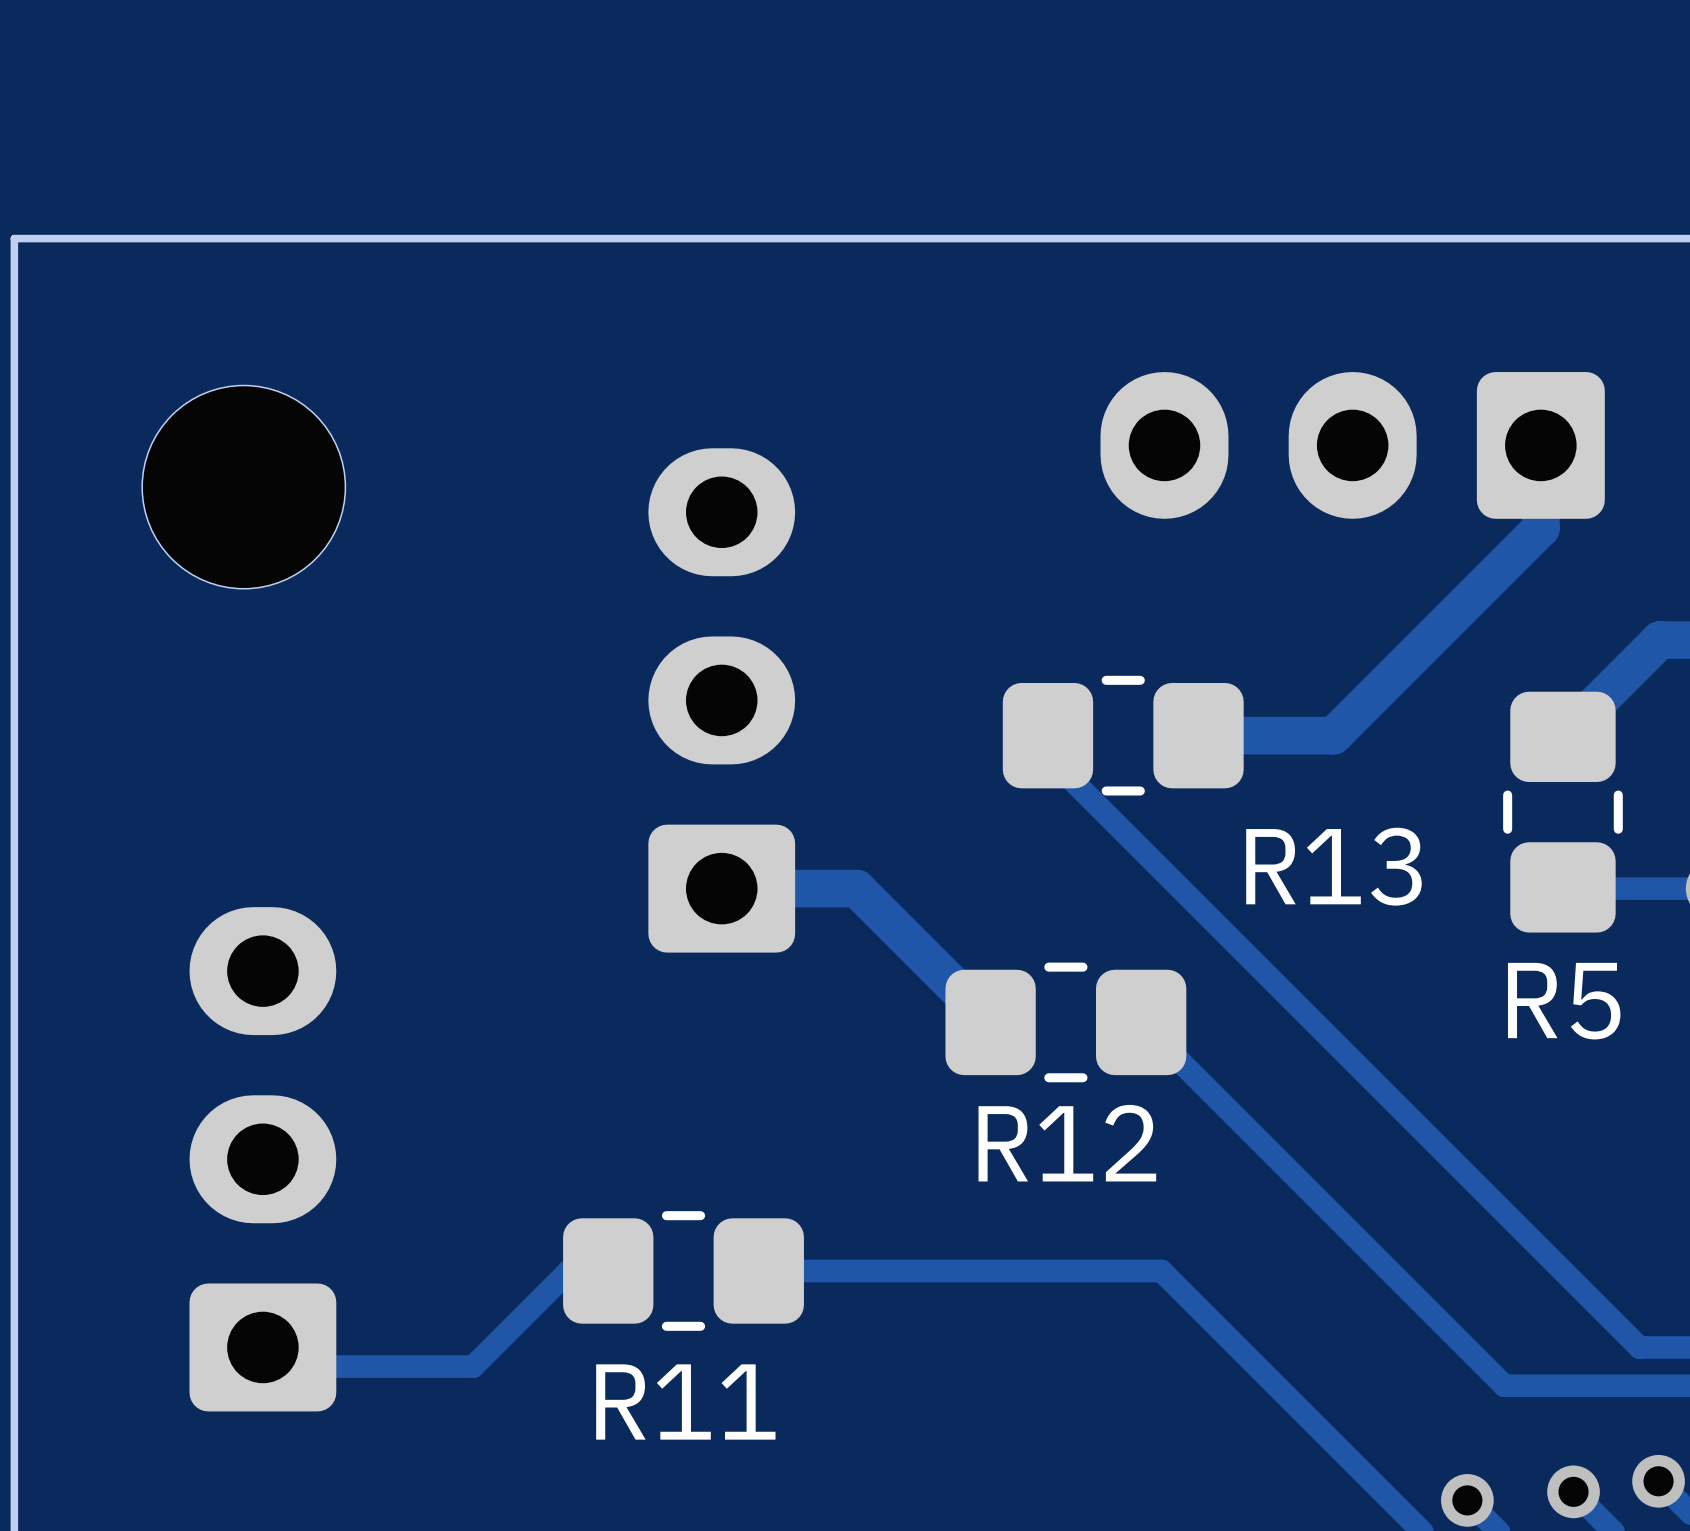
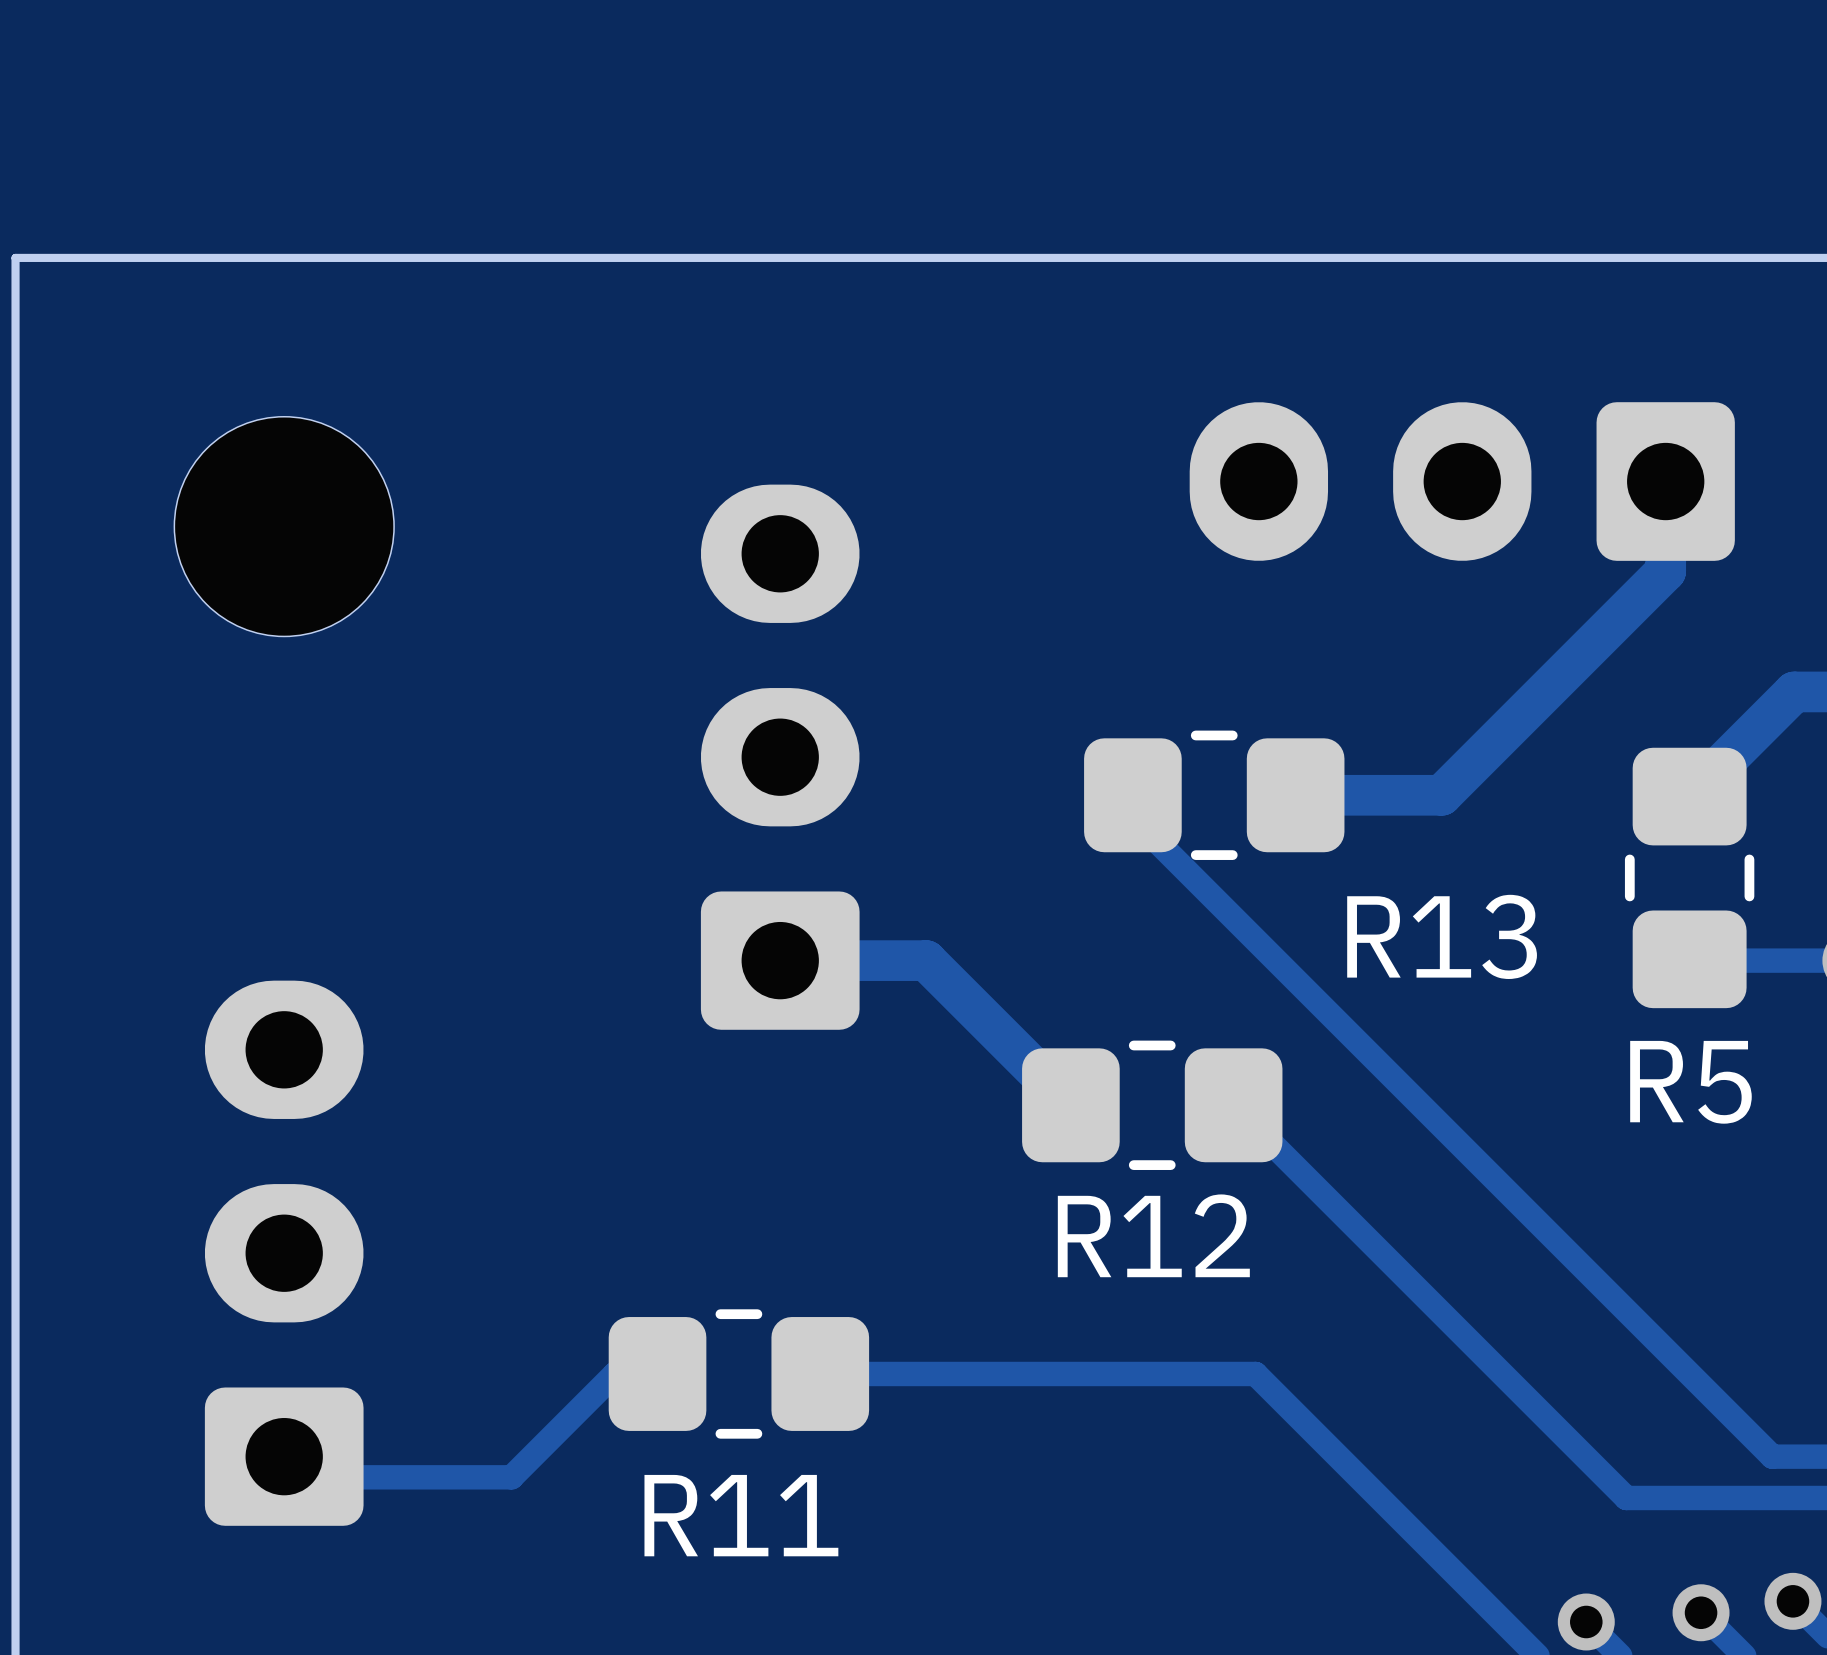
part position: (243, 487) -> (284, 526)

